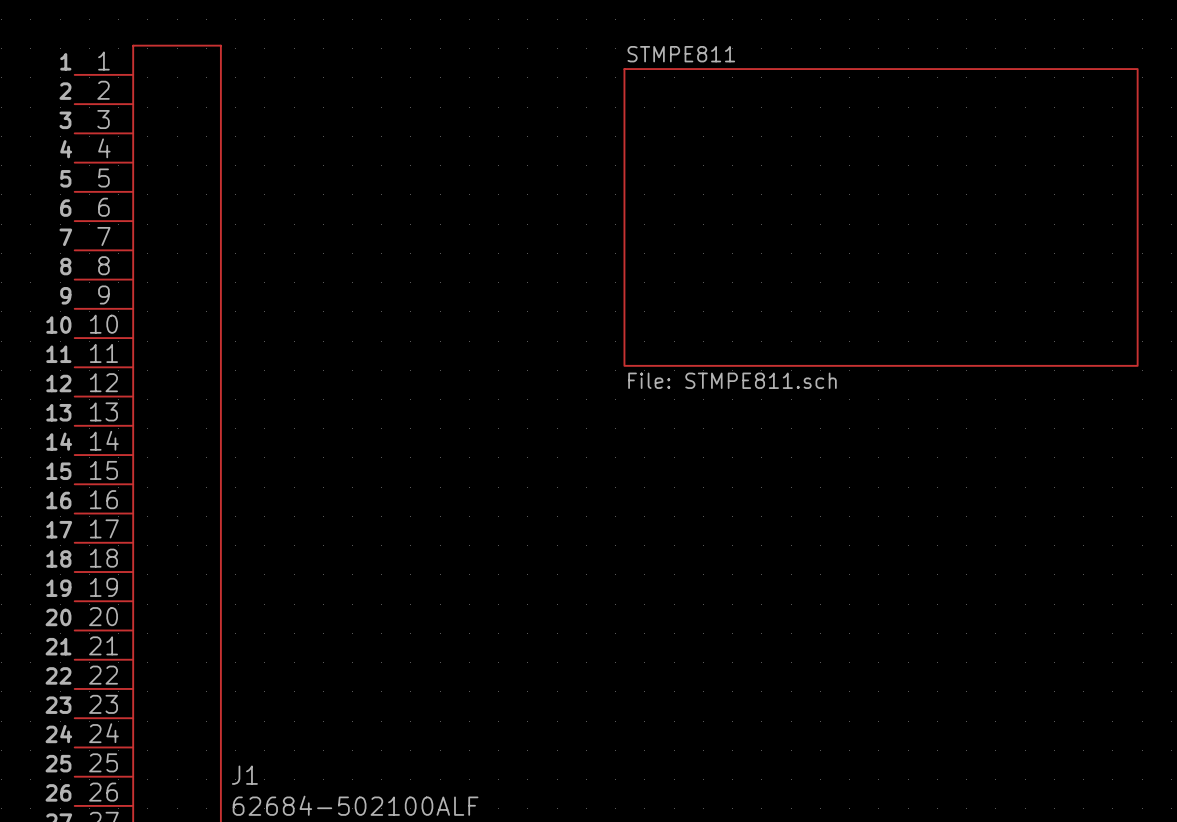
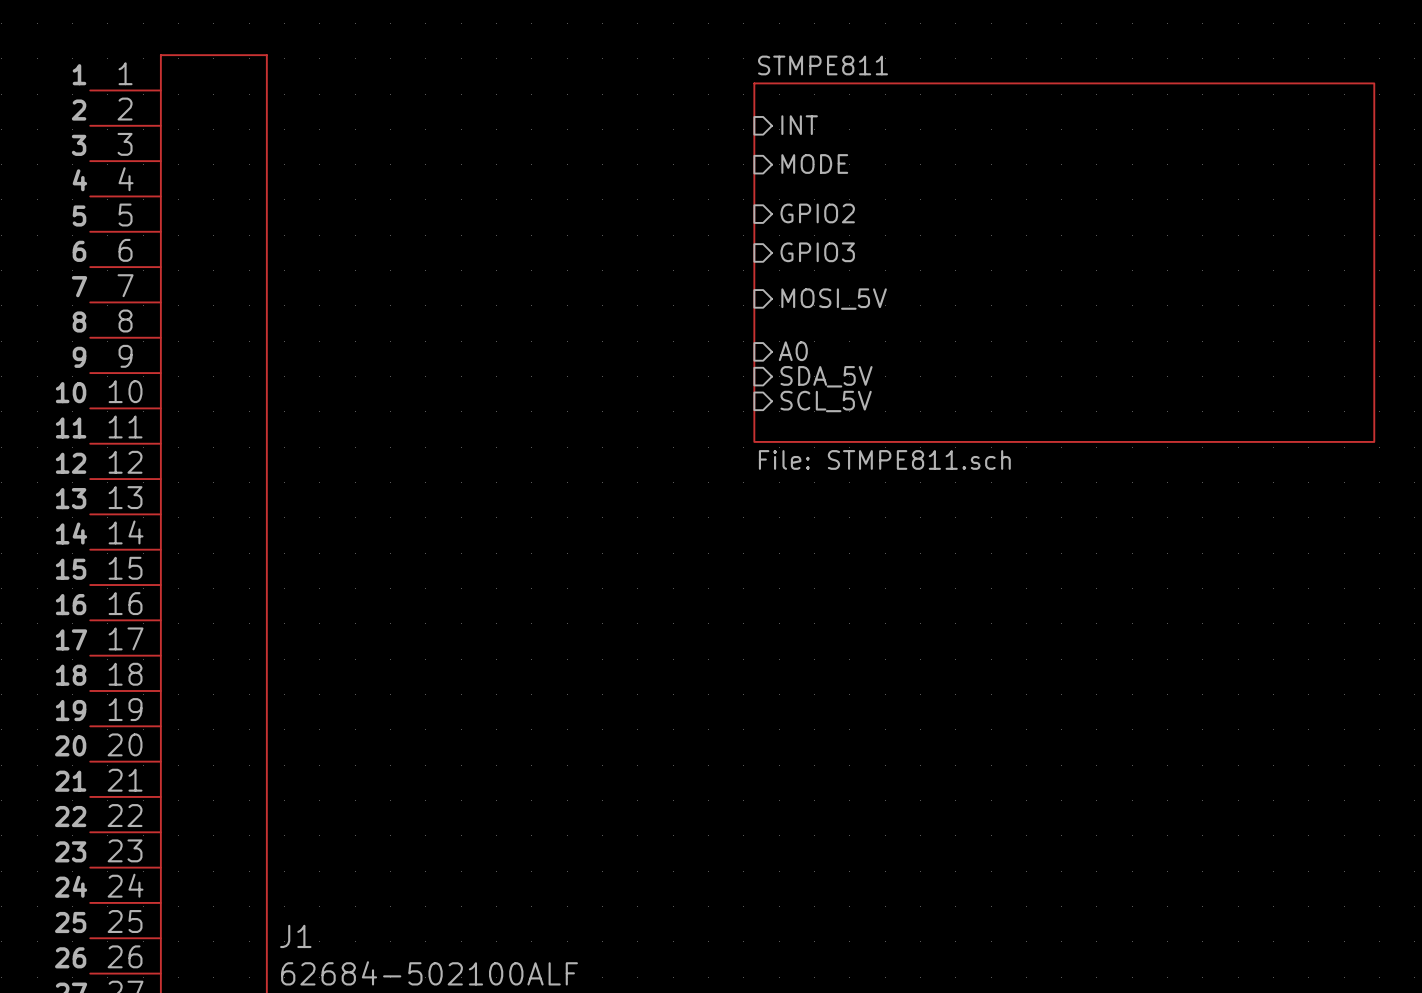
sheet pin: none -> INT (799, 125)
sheet pin: none -> MODE (814, 163)
sheet pin: none -> GPIO2 (817, 213)
sheet pin: none -> GPIO3 (817, 252)
sheet pin: none -> MOSI_5V (834, 299)
sheet pin: none -> A0 (793, 351)
sheet pin: none -> SDA_5V (826, 376)
sheet pin: none -> SCL_5V (826, 401)

